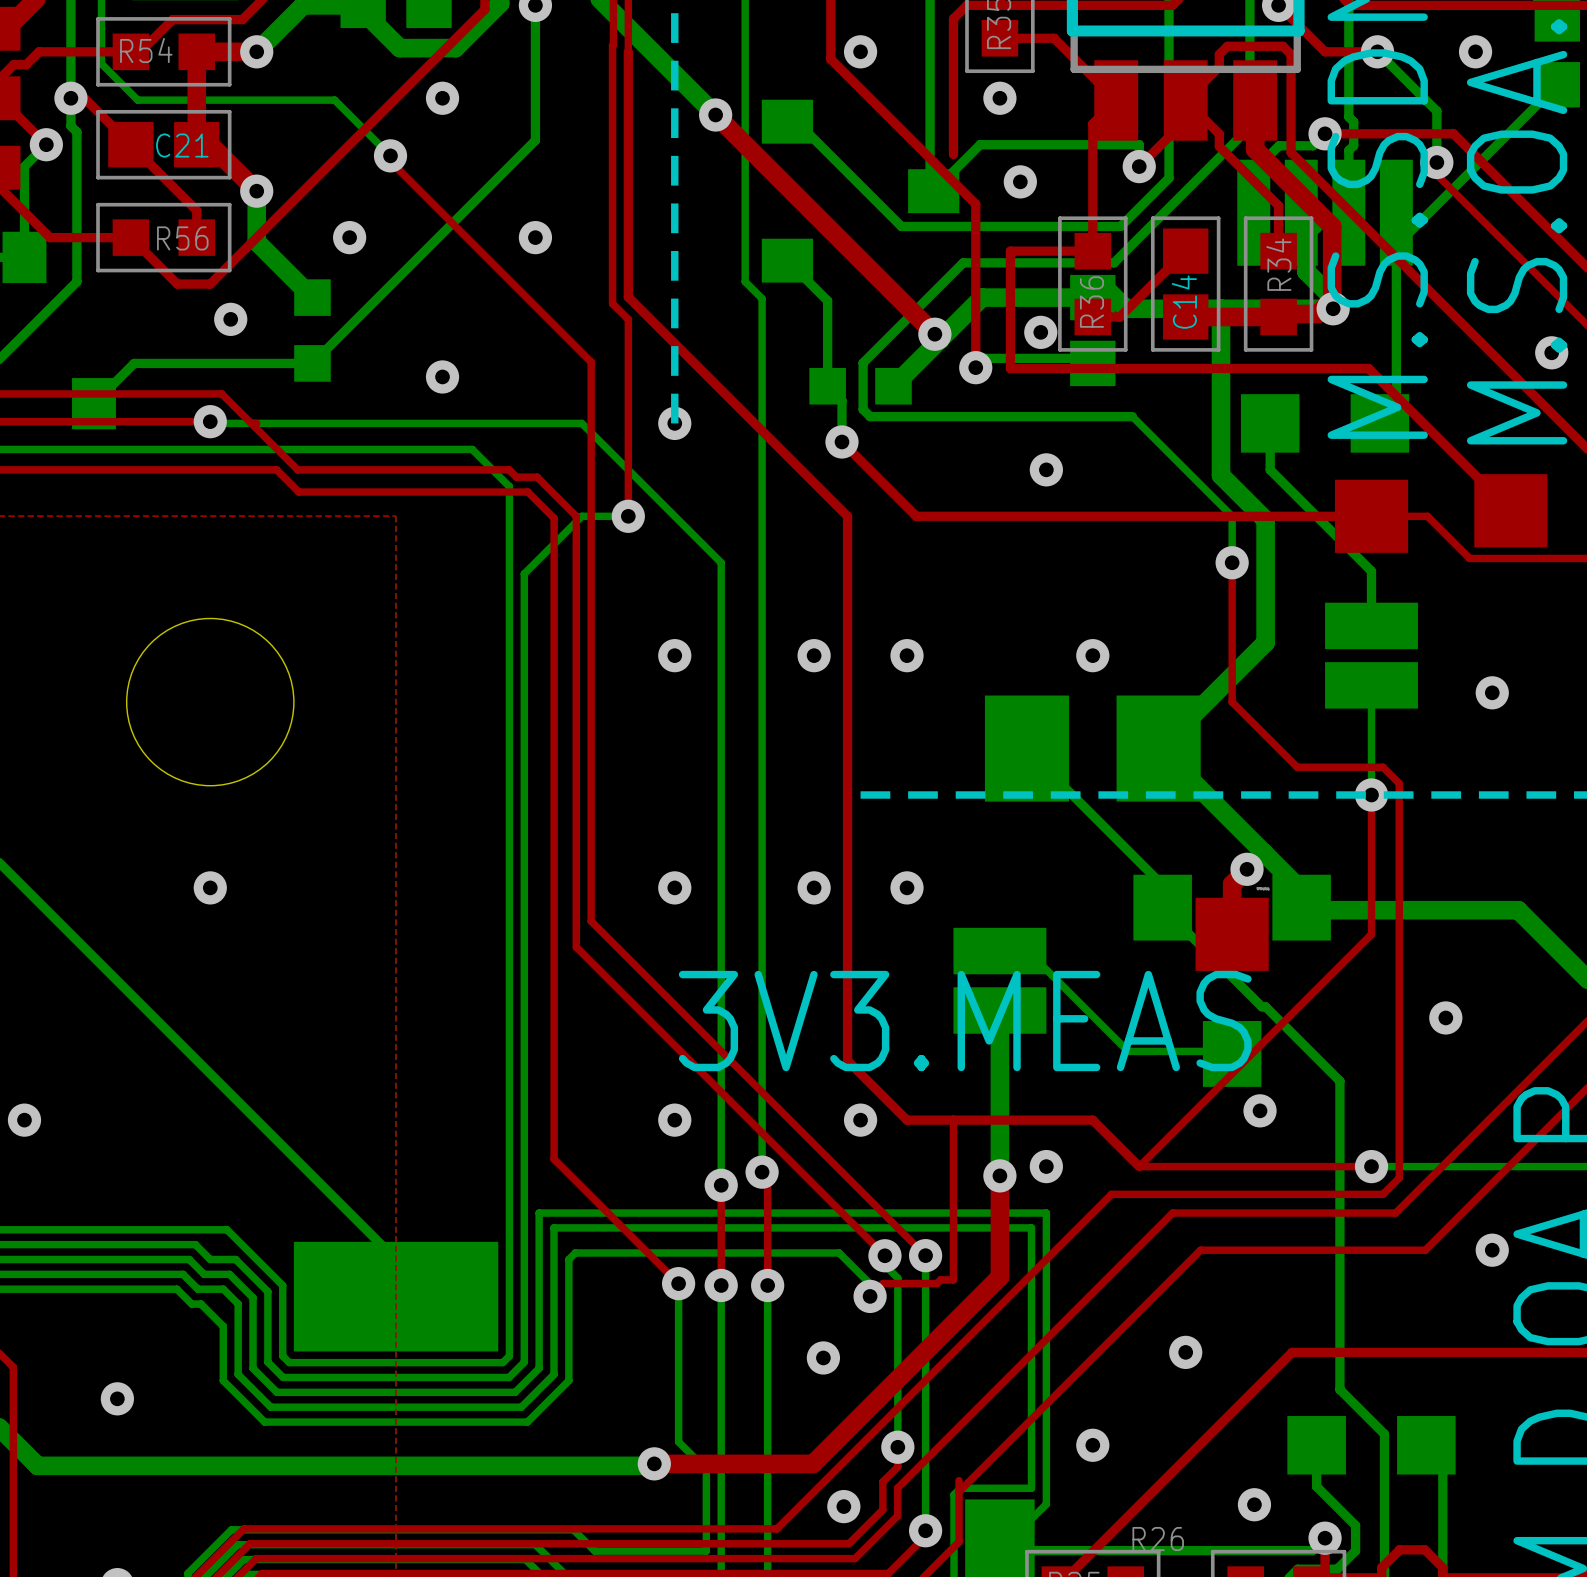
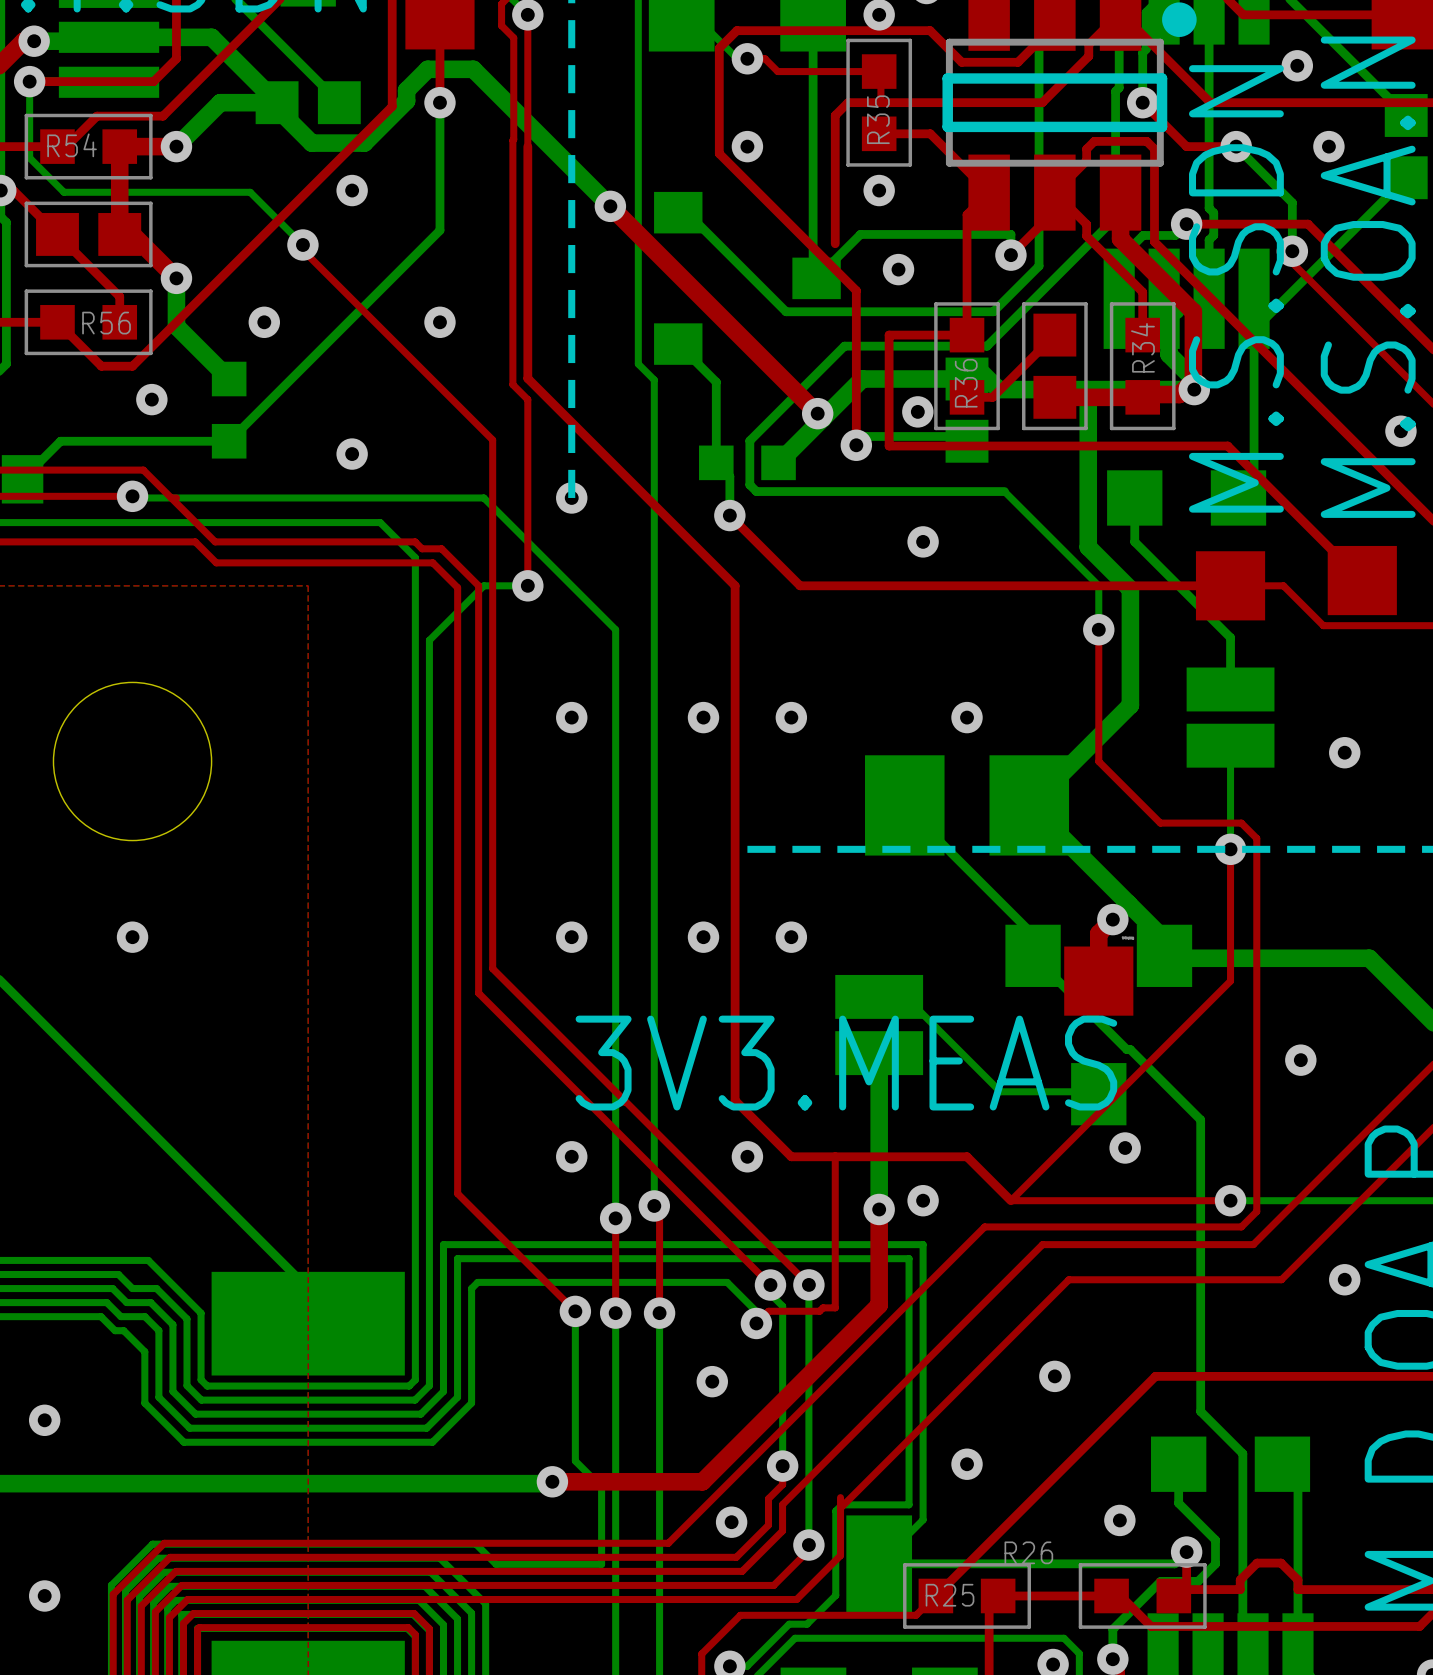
C21 name: C21 (182, 145) -> none
C14 name: C14 (1184, 302) -> none

